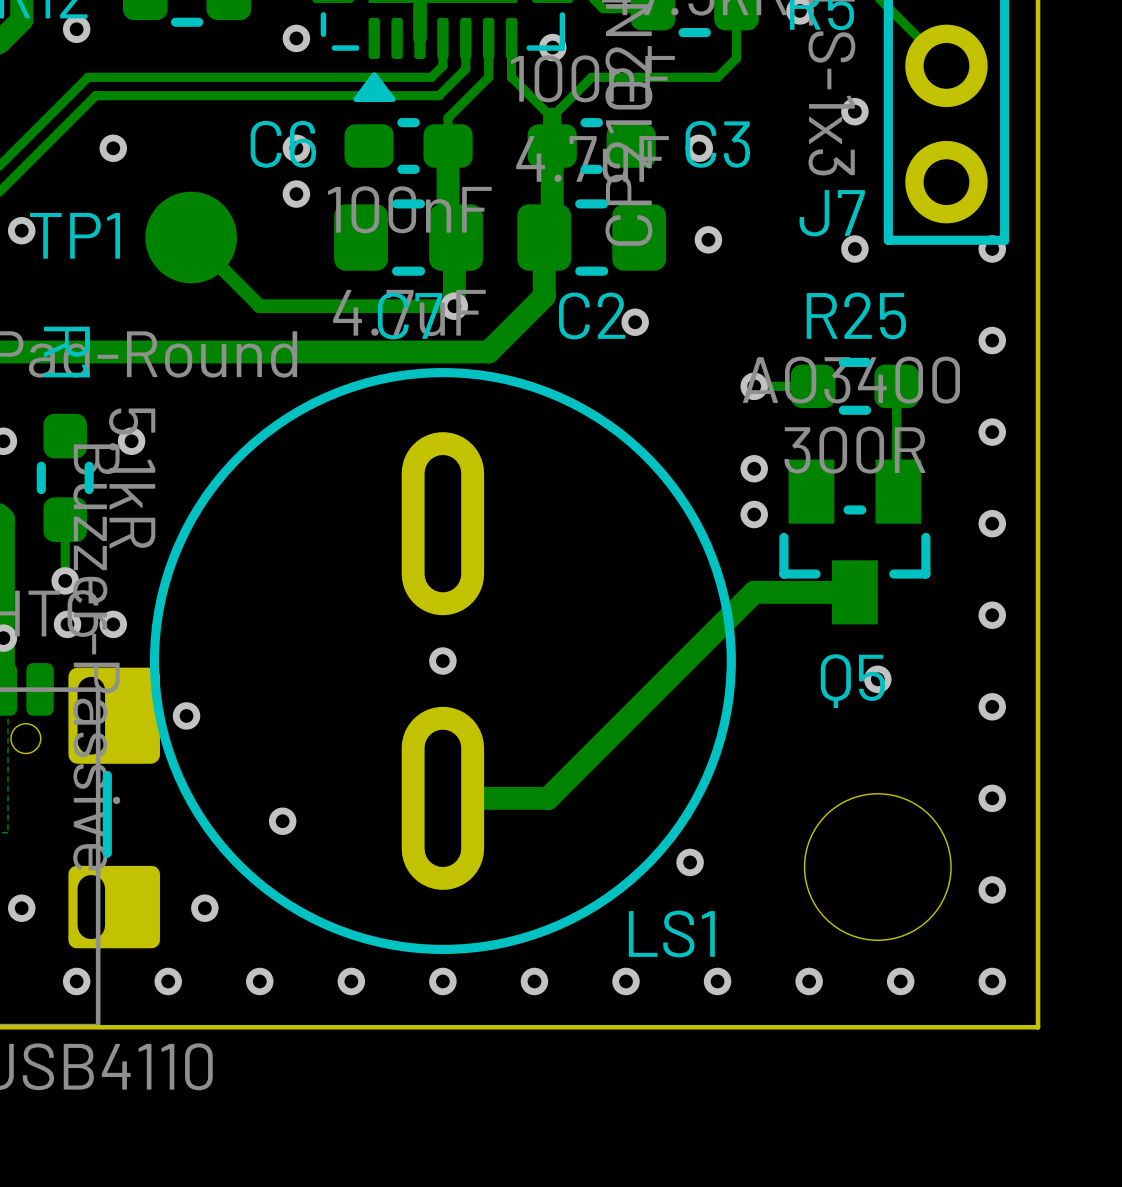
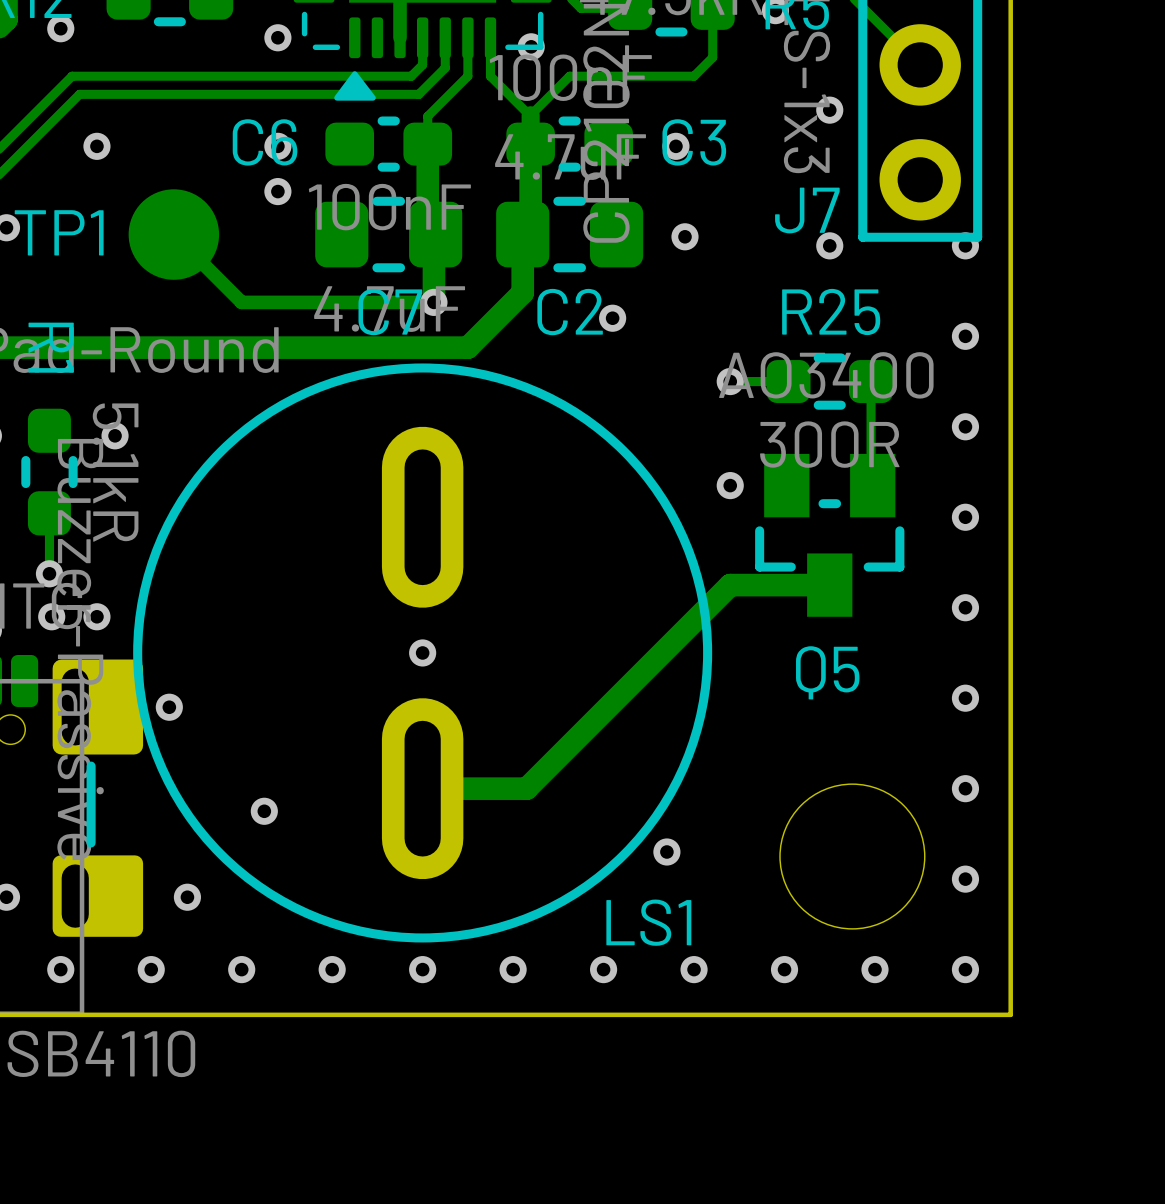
via: (754, 468) -> none
via: none -> (730, 485)
via: (754, 514) -> none
via: (877, 679) -> none

